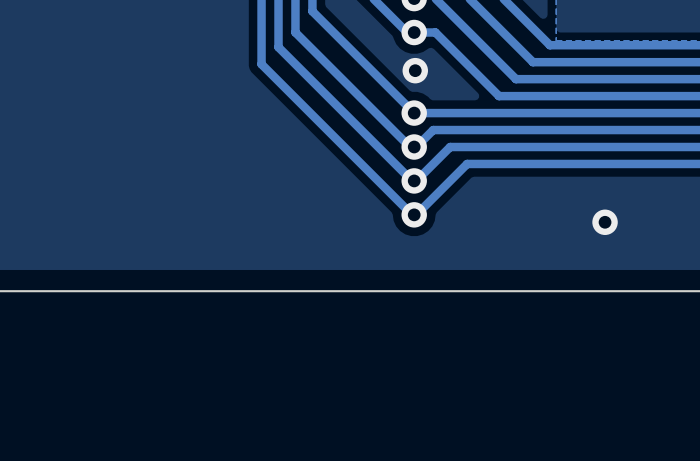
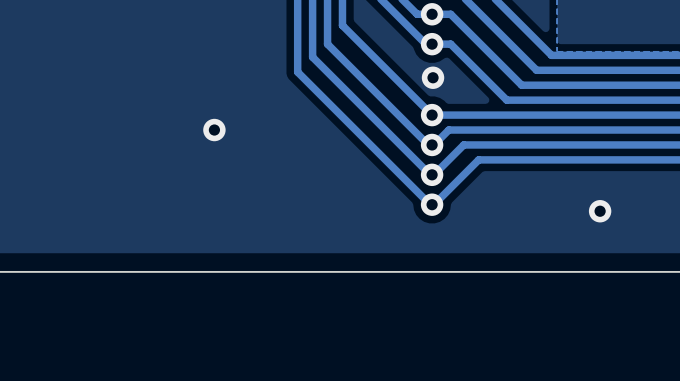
via: none -> (214, 130)

